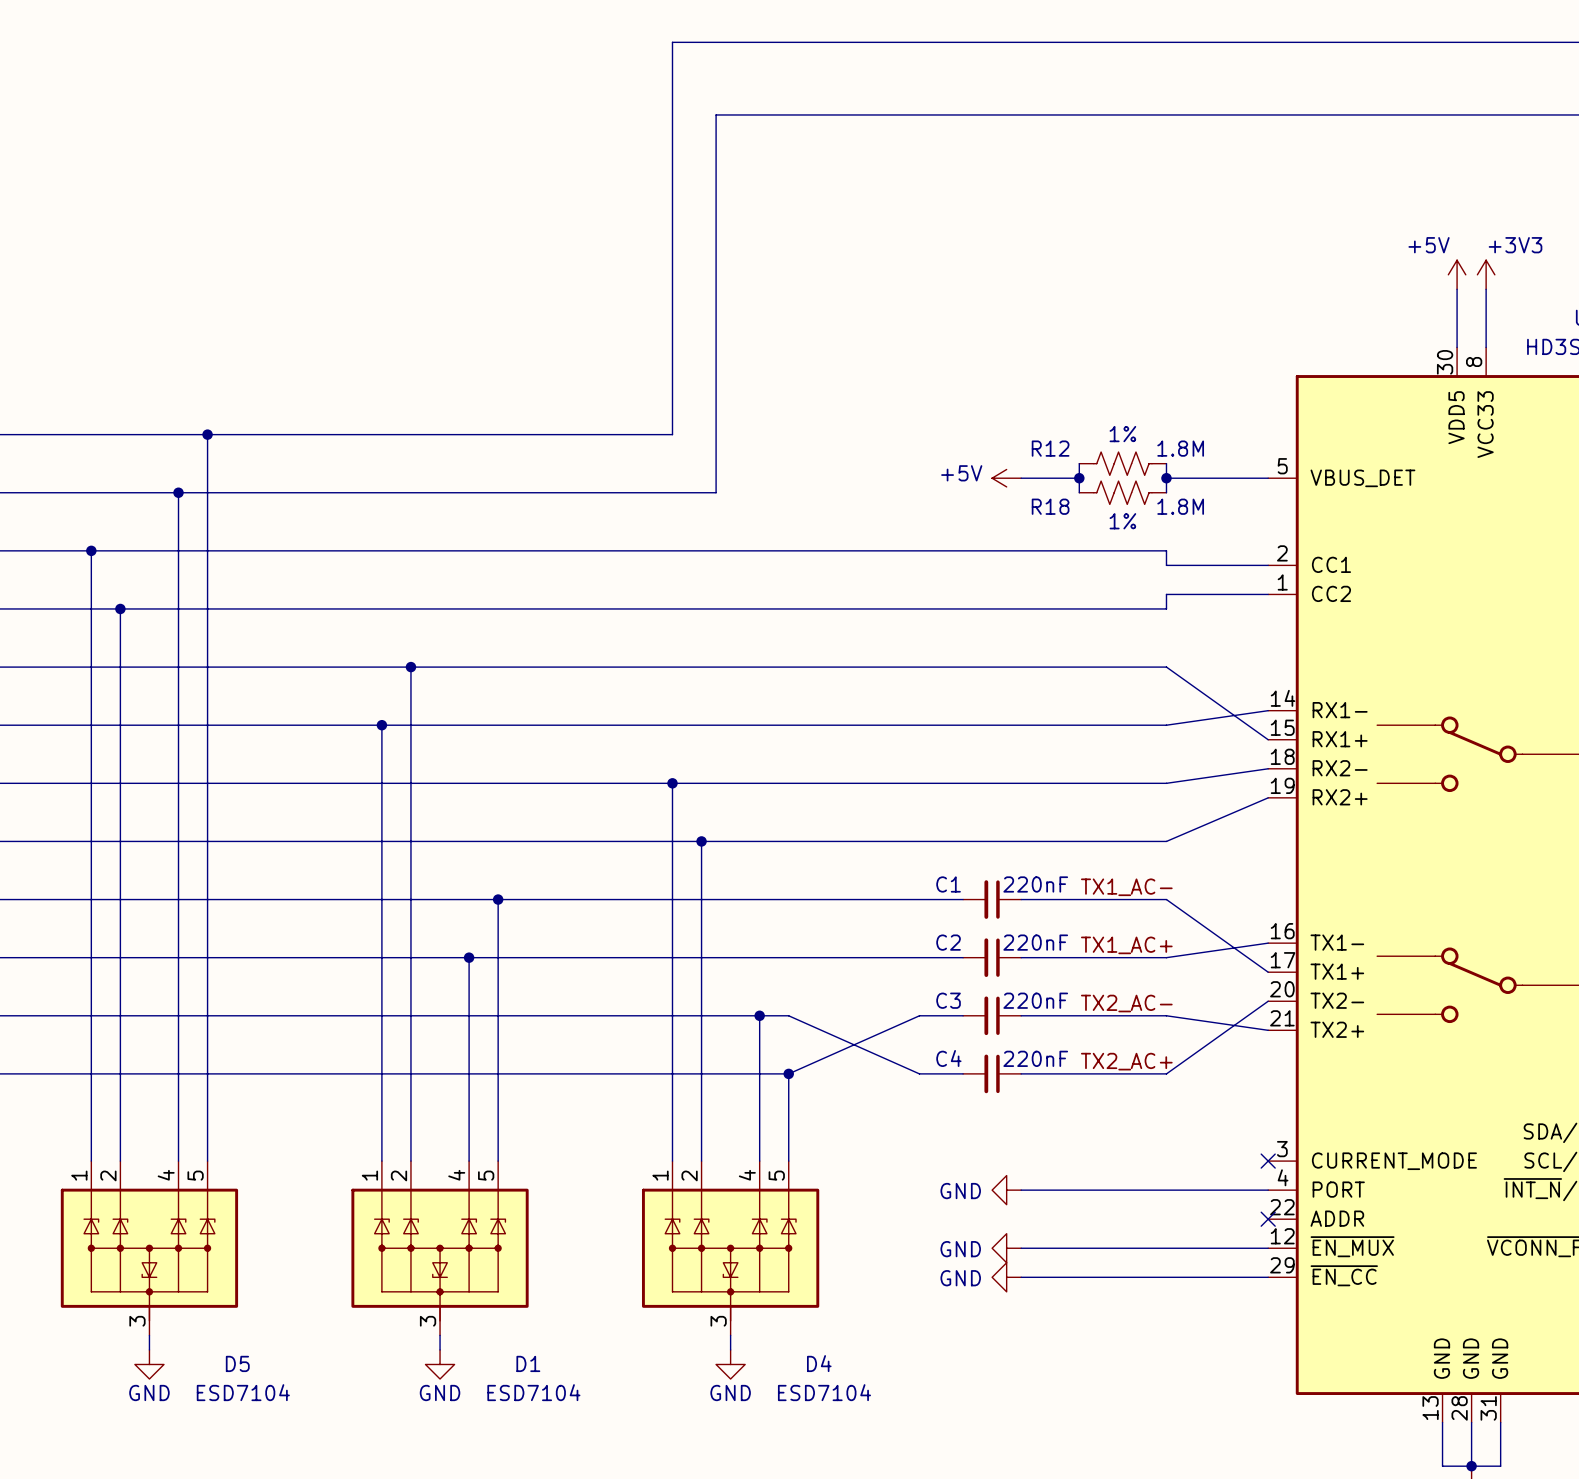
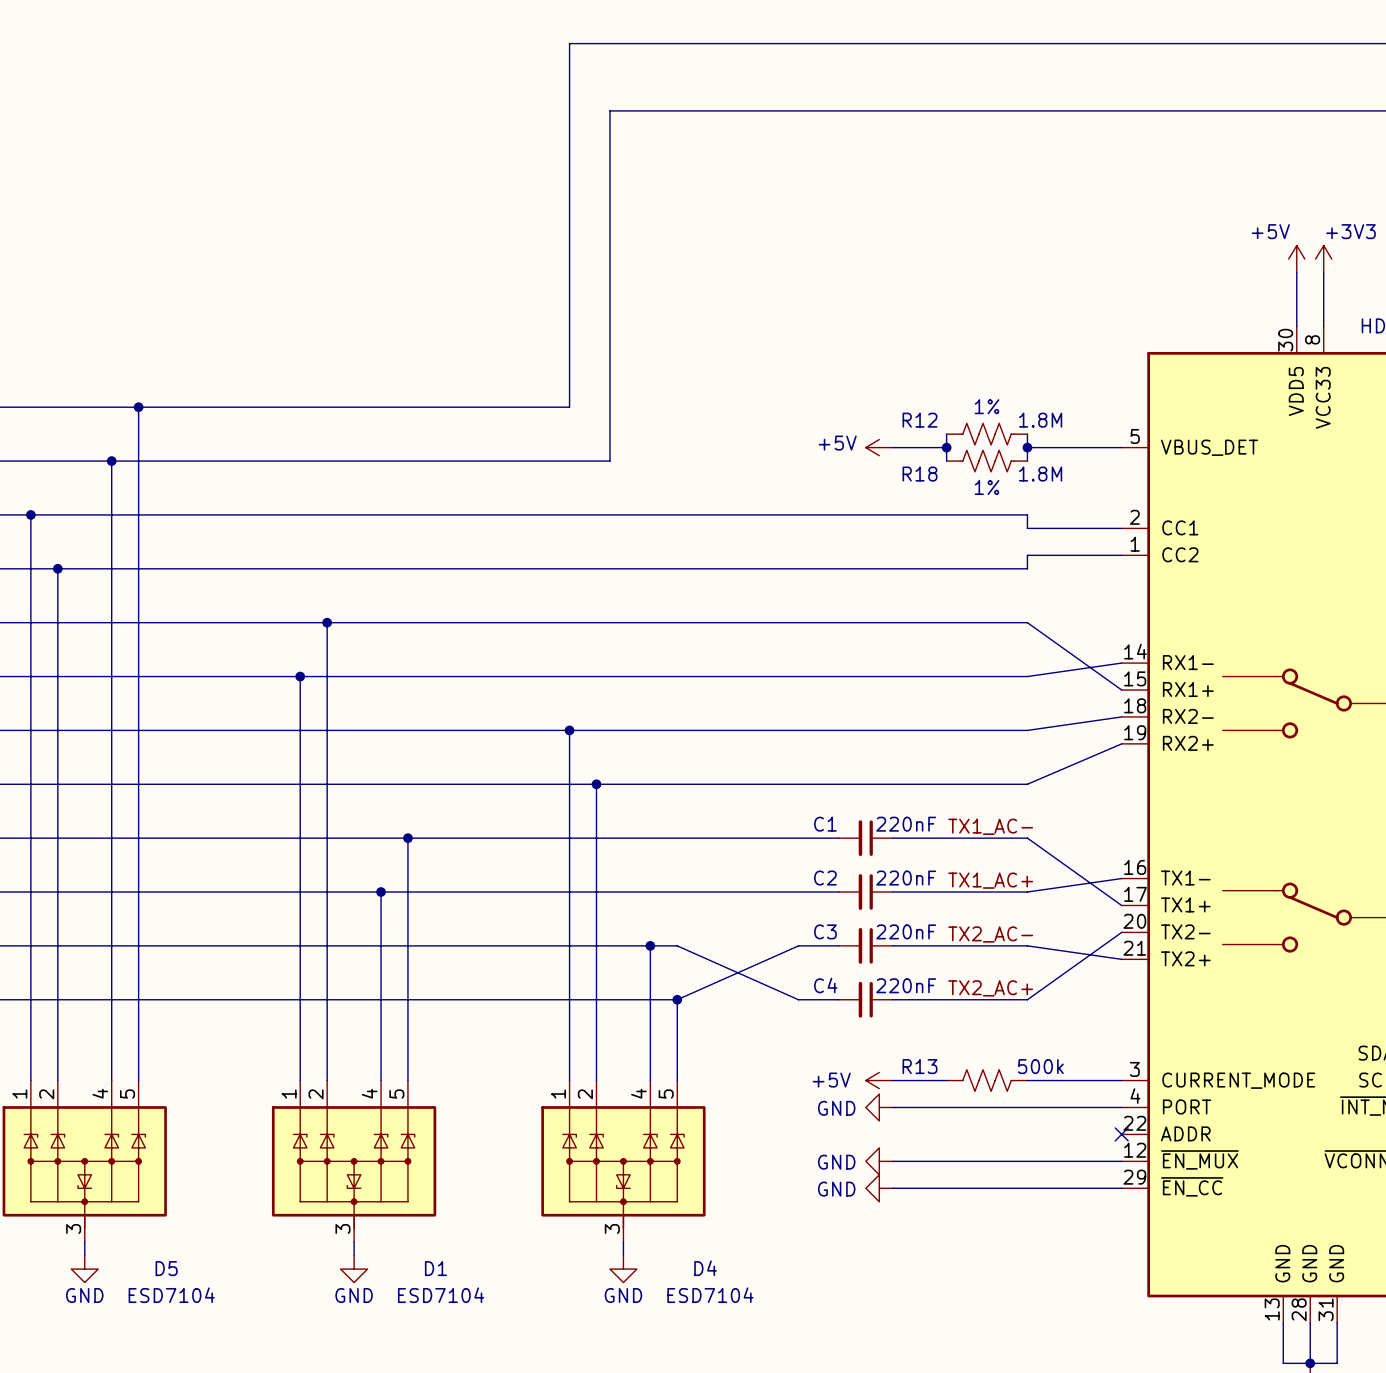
power symbol: none -> +5V (879, 1080)
wire: none -> (892, 1080) (946, 1080)
R13: none -> 500k (987, 1080)
wire: none -> (1027, 1080) (1121, 1080)
no-connect mark: (1268, 1161) -> none

